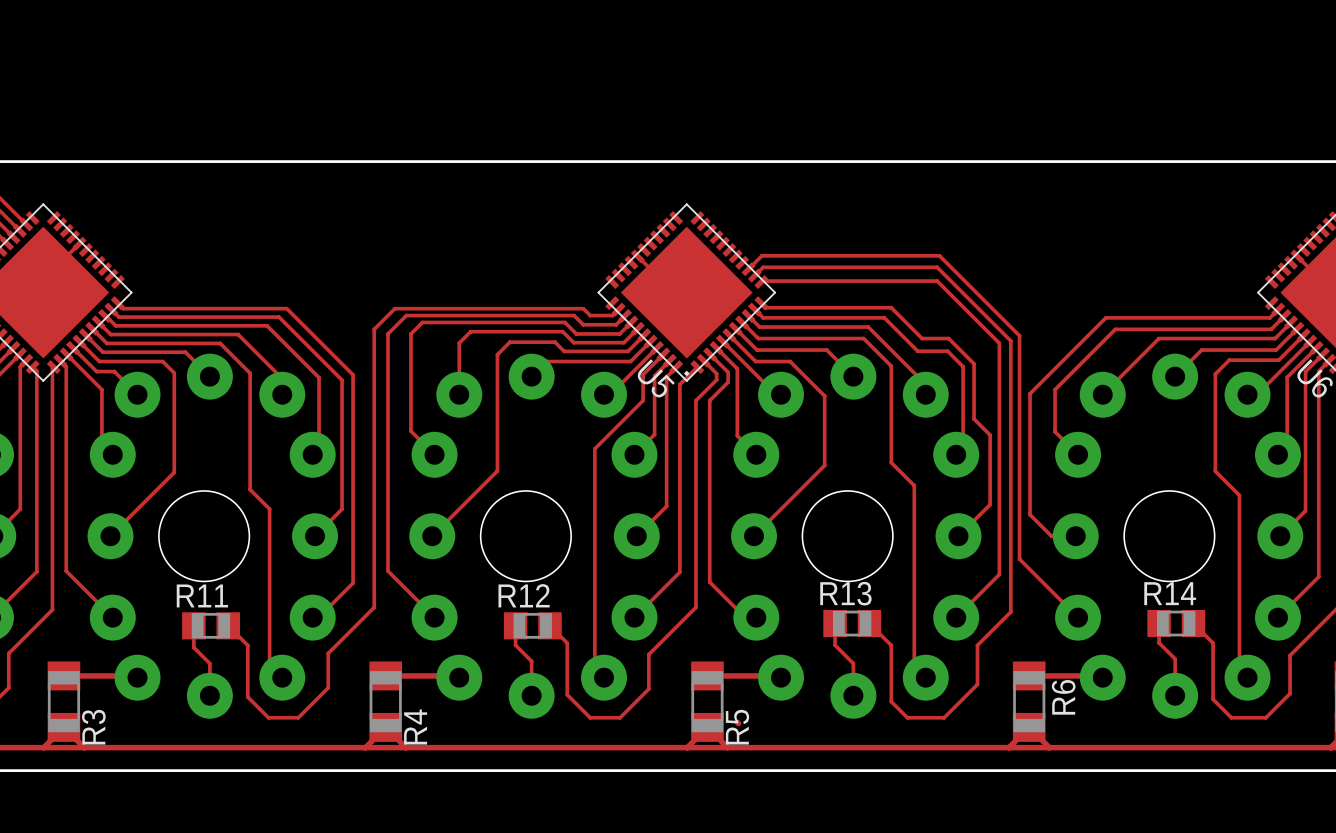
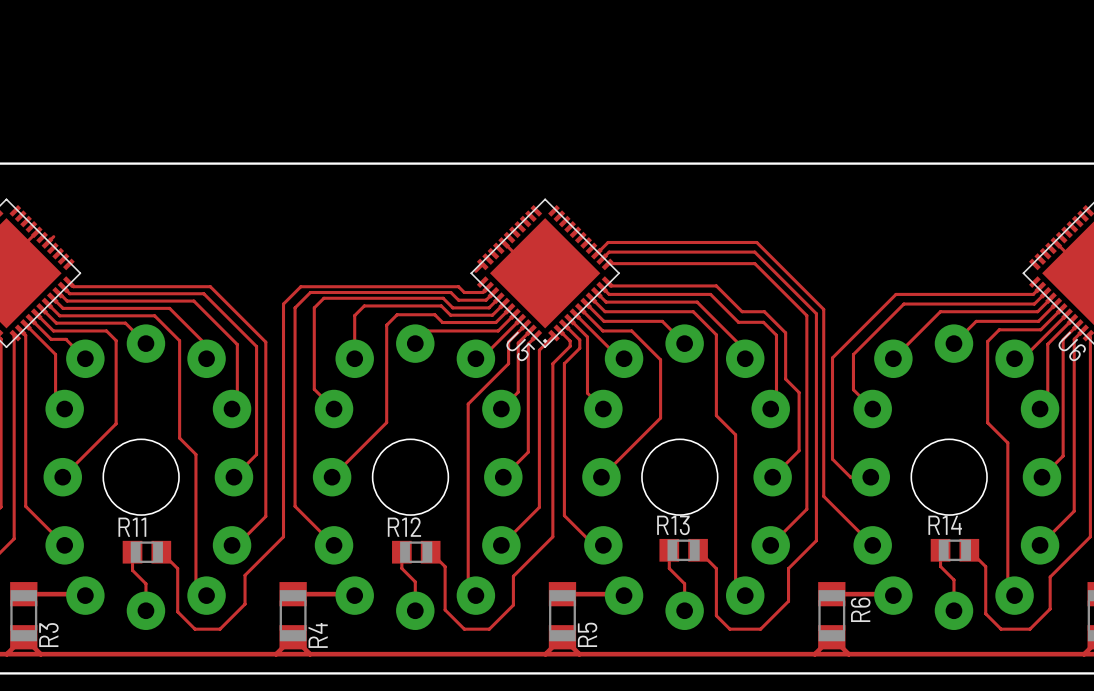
top track: none -> (53, 236) (47, 242)
top track: none -> (482, 264) (475, 271)
top track: (737, 722) (738, 723) -> none

